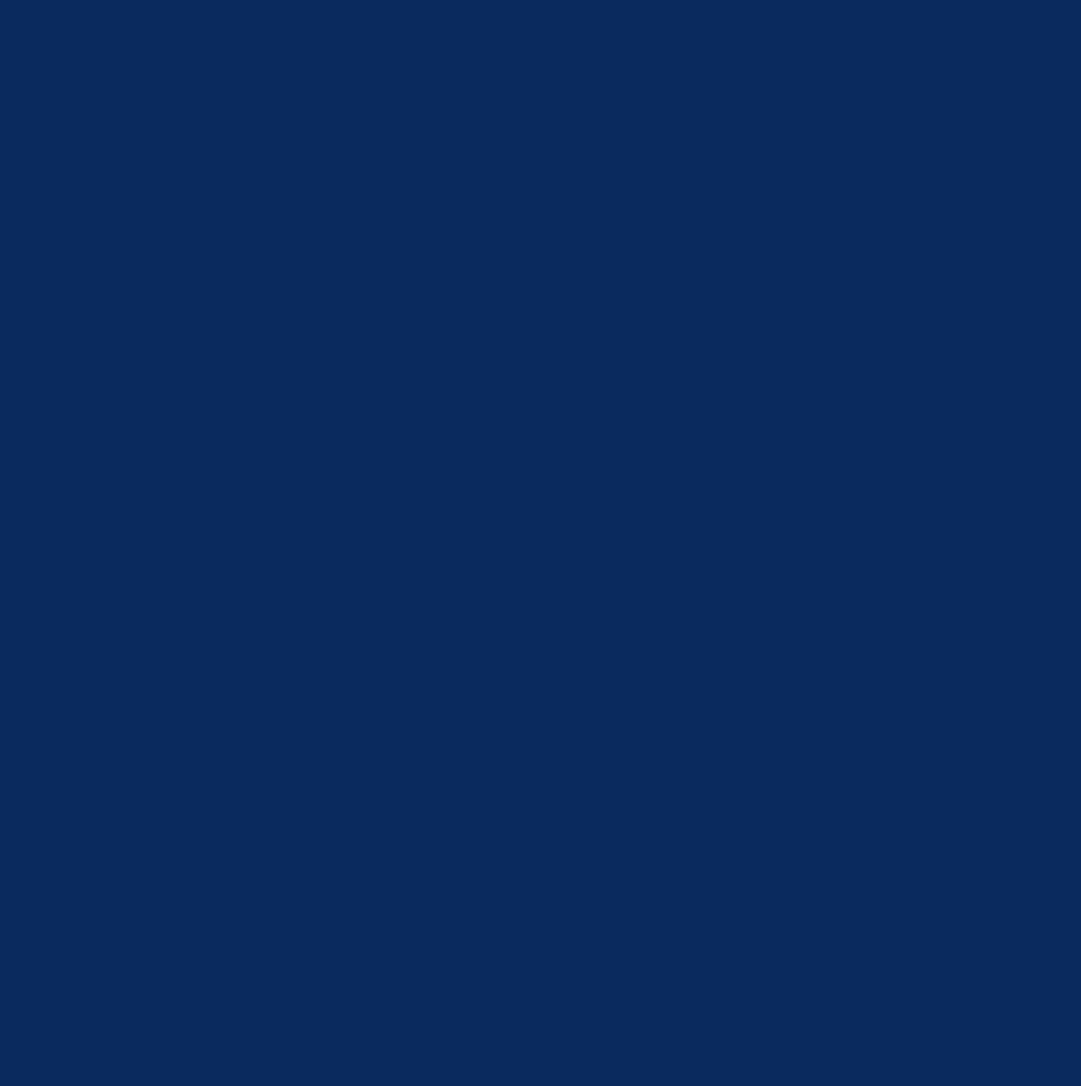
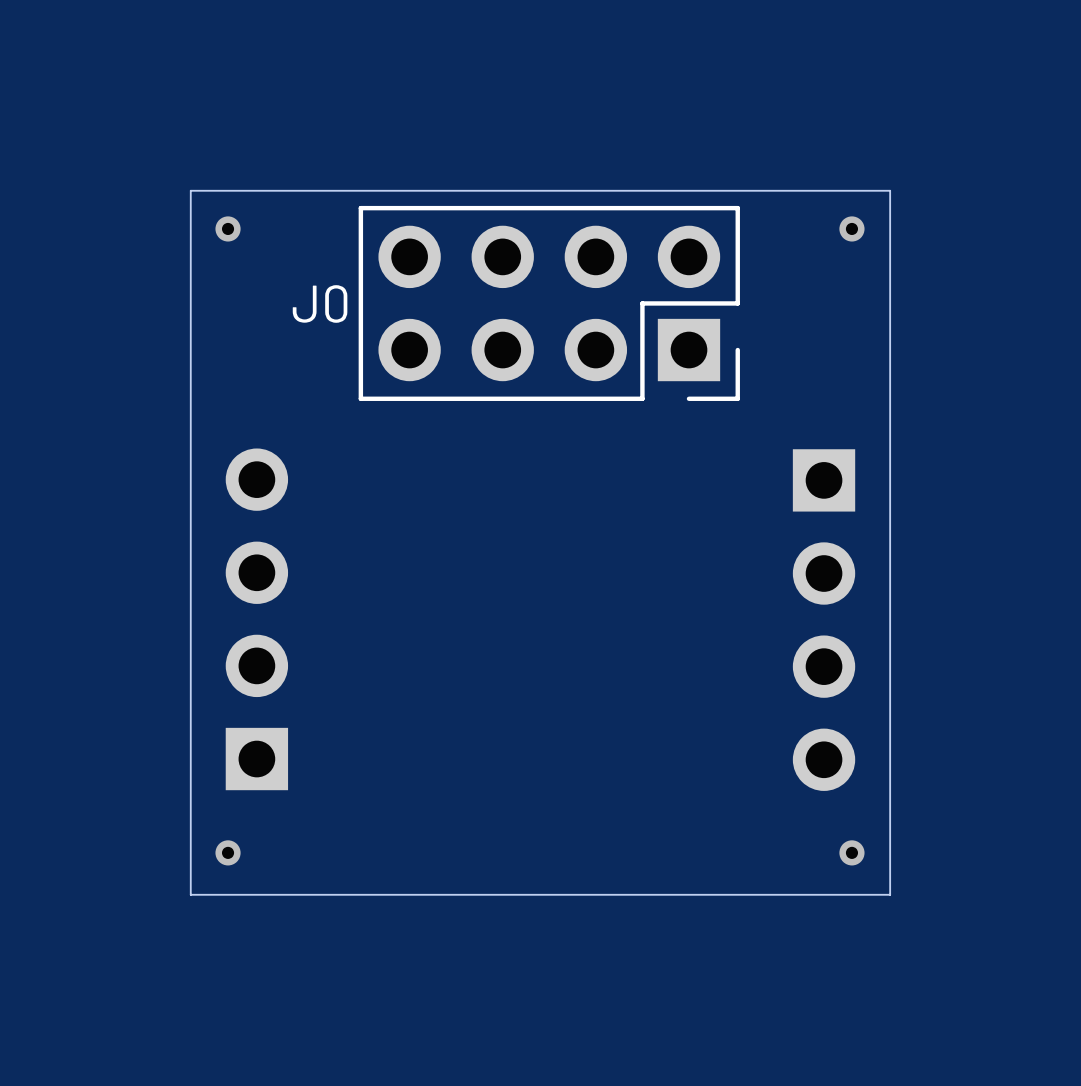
board edge: none -> (890, 190) (890, 894) (190, 894) (190, 190) (890, 190)
via: none -> (228, 228)
via: none -> (851, 228)
J0: none -> (549, 303)
part: none -> (256, 619)
part: none -> (824, 620)
via: none -> (228, 852)
via: none -> (851, 852)

